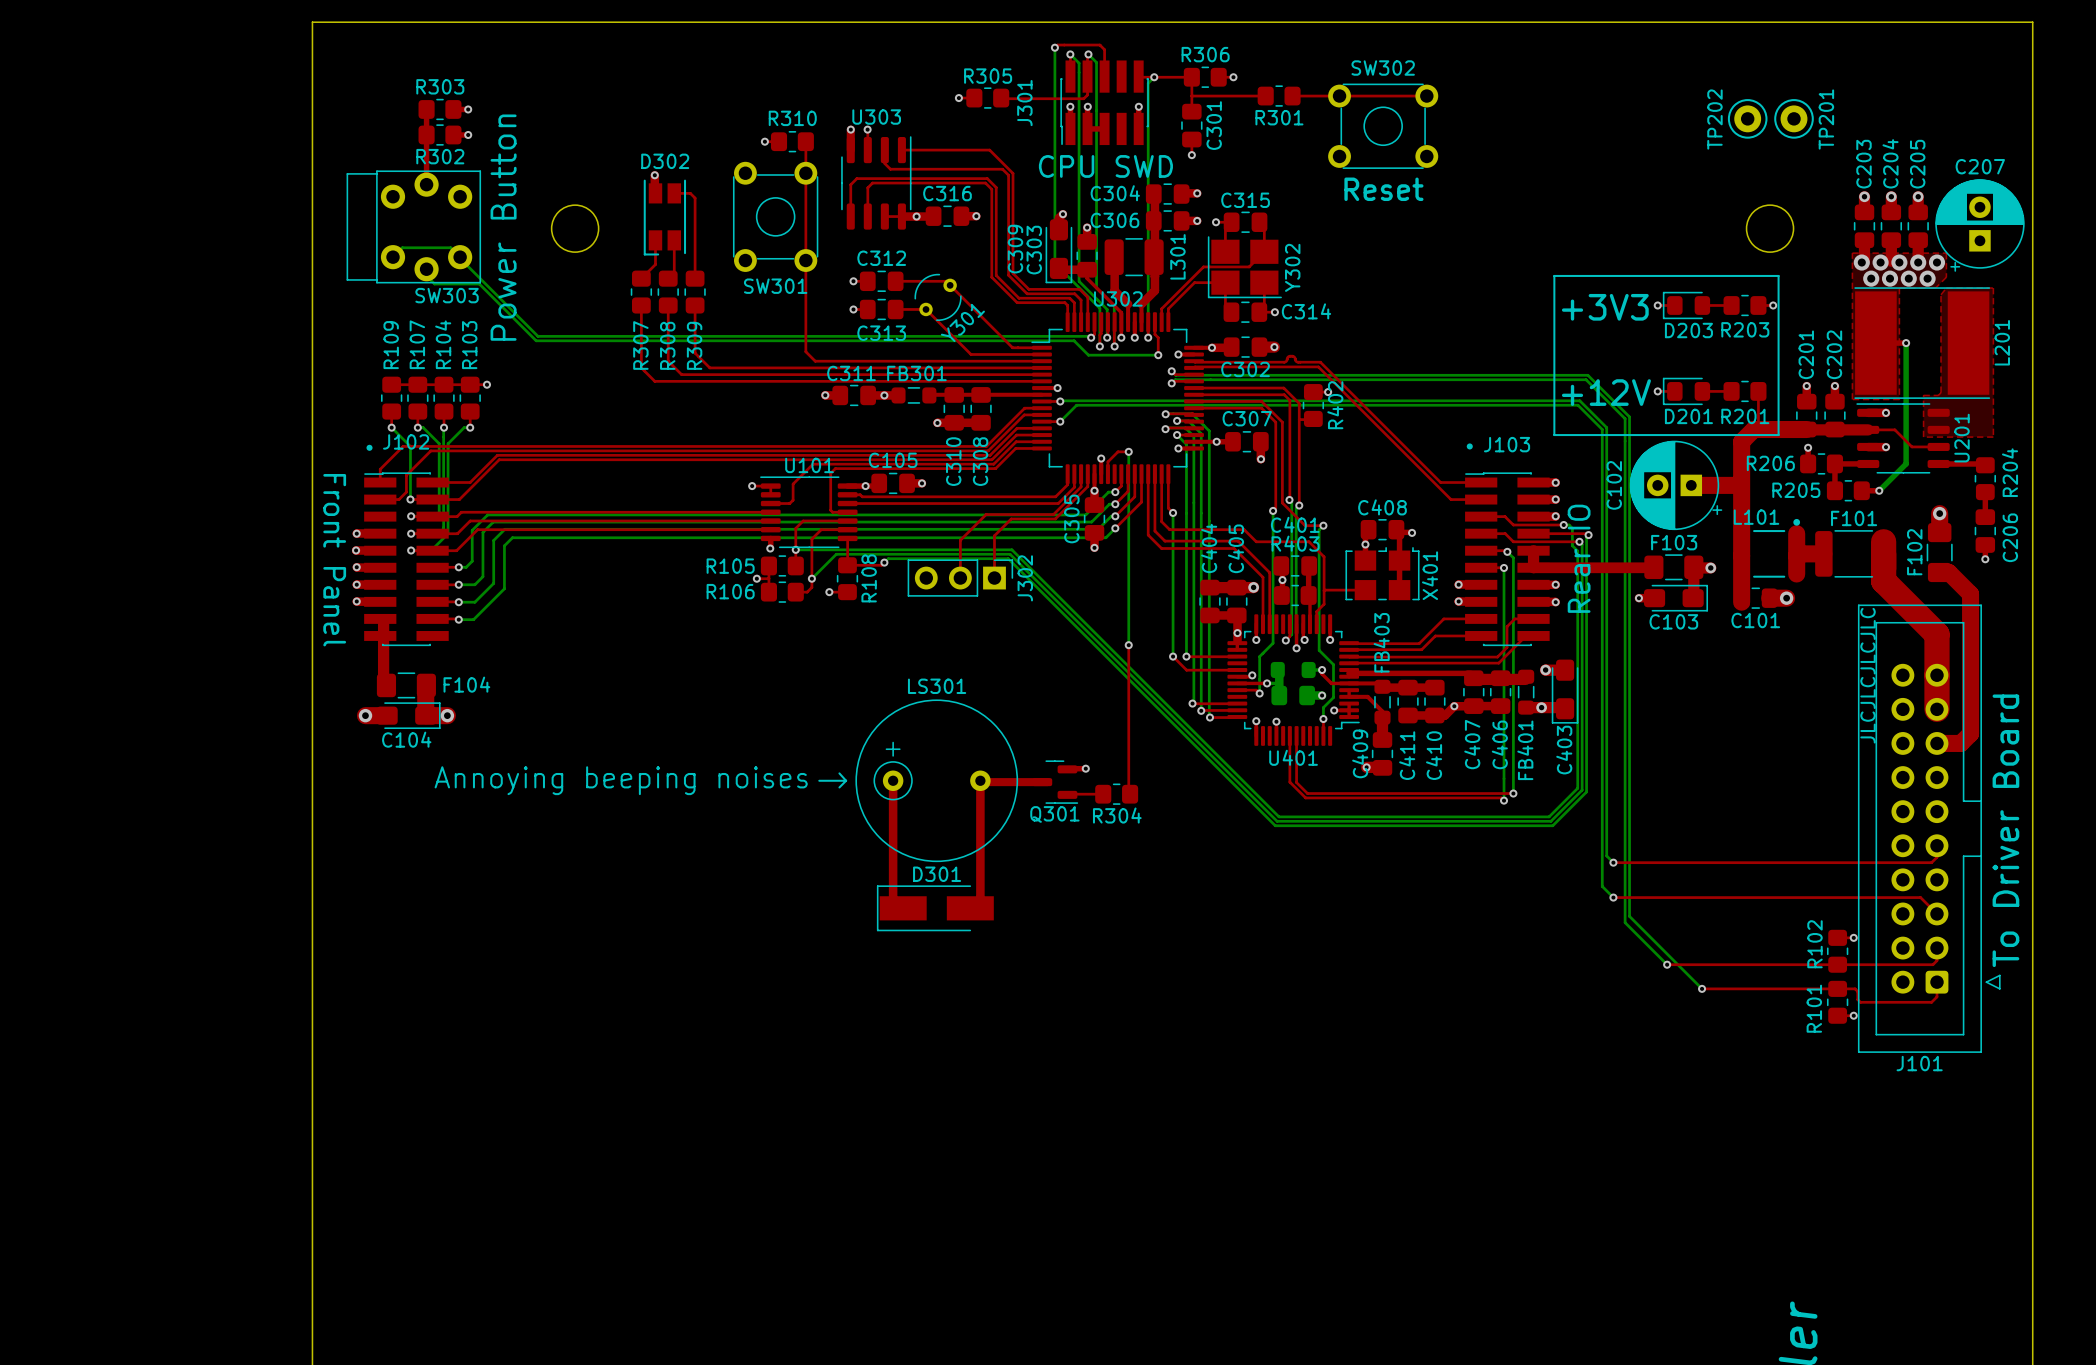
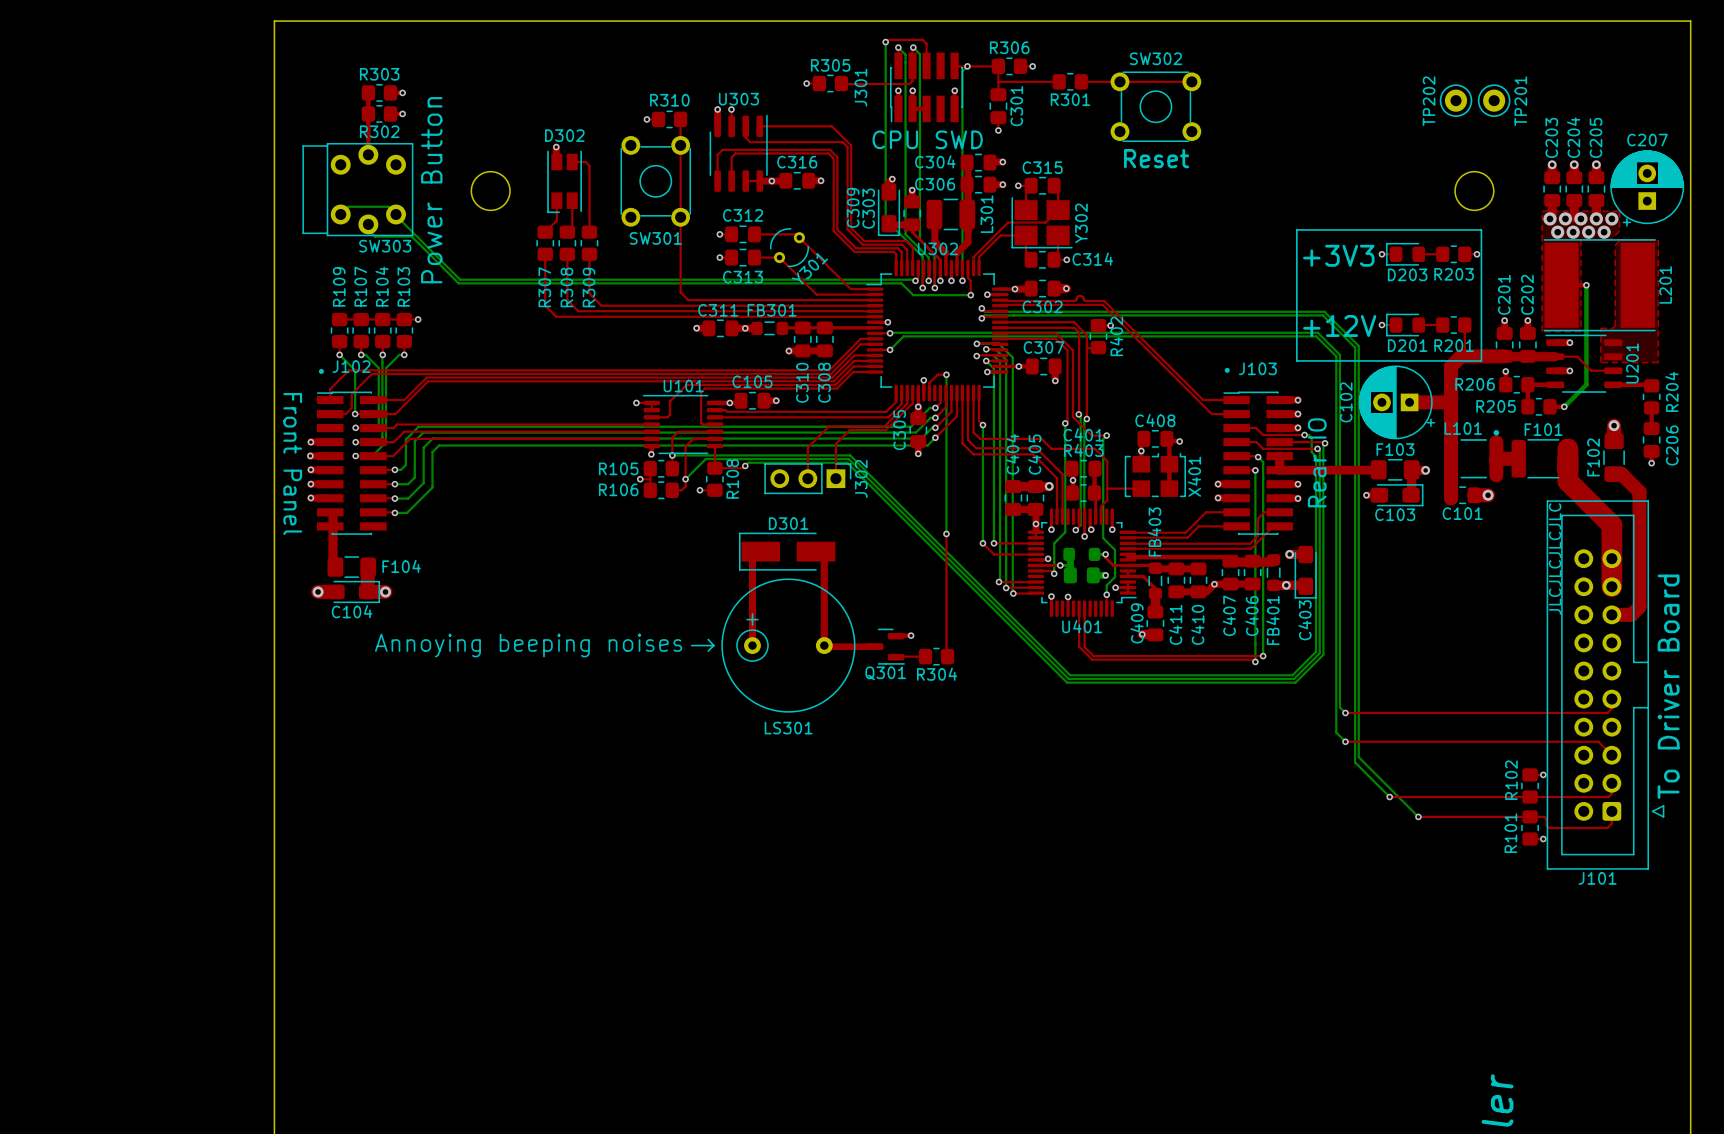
LS301 name position: LS301 (937, 686) -> LS301 (788, 728)
top track: (893, 780) (893, 898) (903, 908) -> (752, 645) (752, 548)
top track: (980, 780) (980, 898) (970, 908) -> (824, 645) (824, 548)
D301 position: (935, 908) -> (787, 551)

